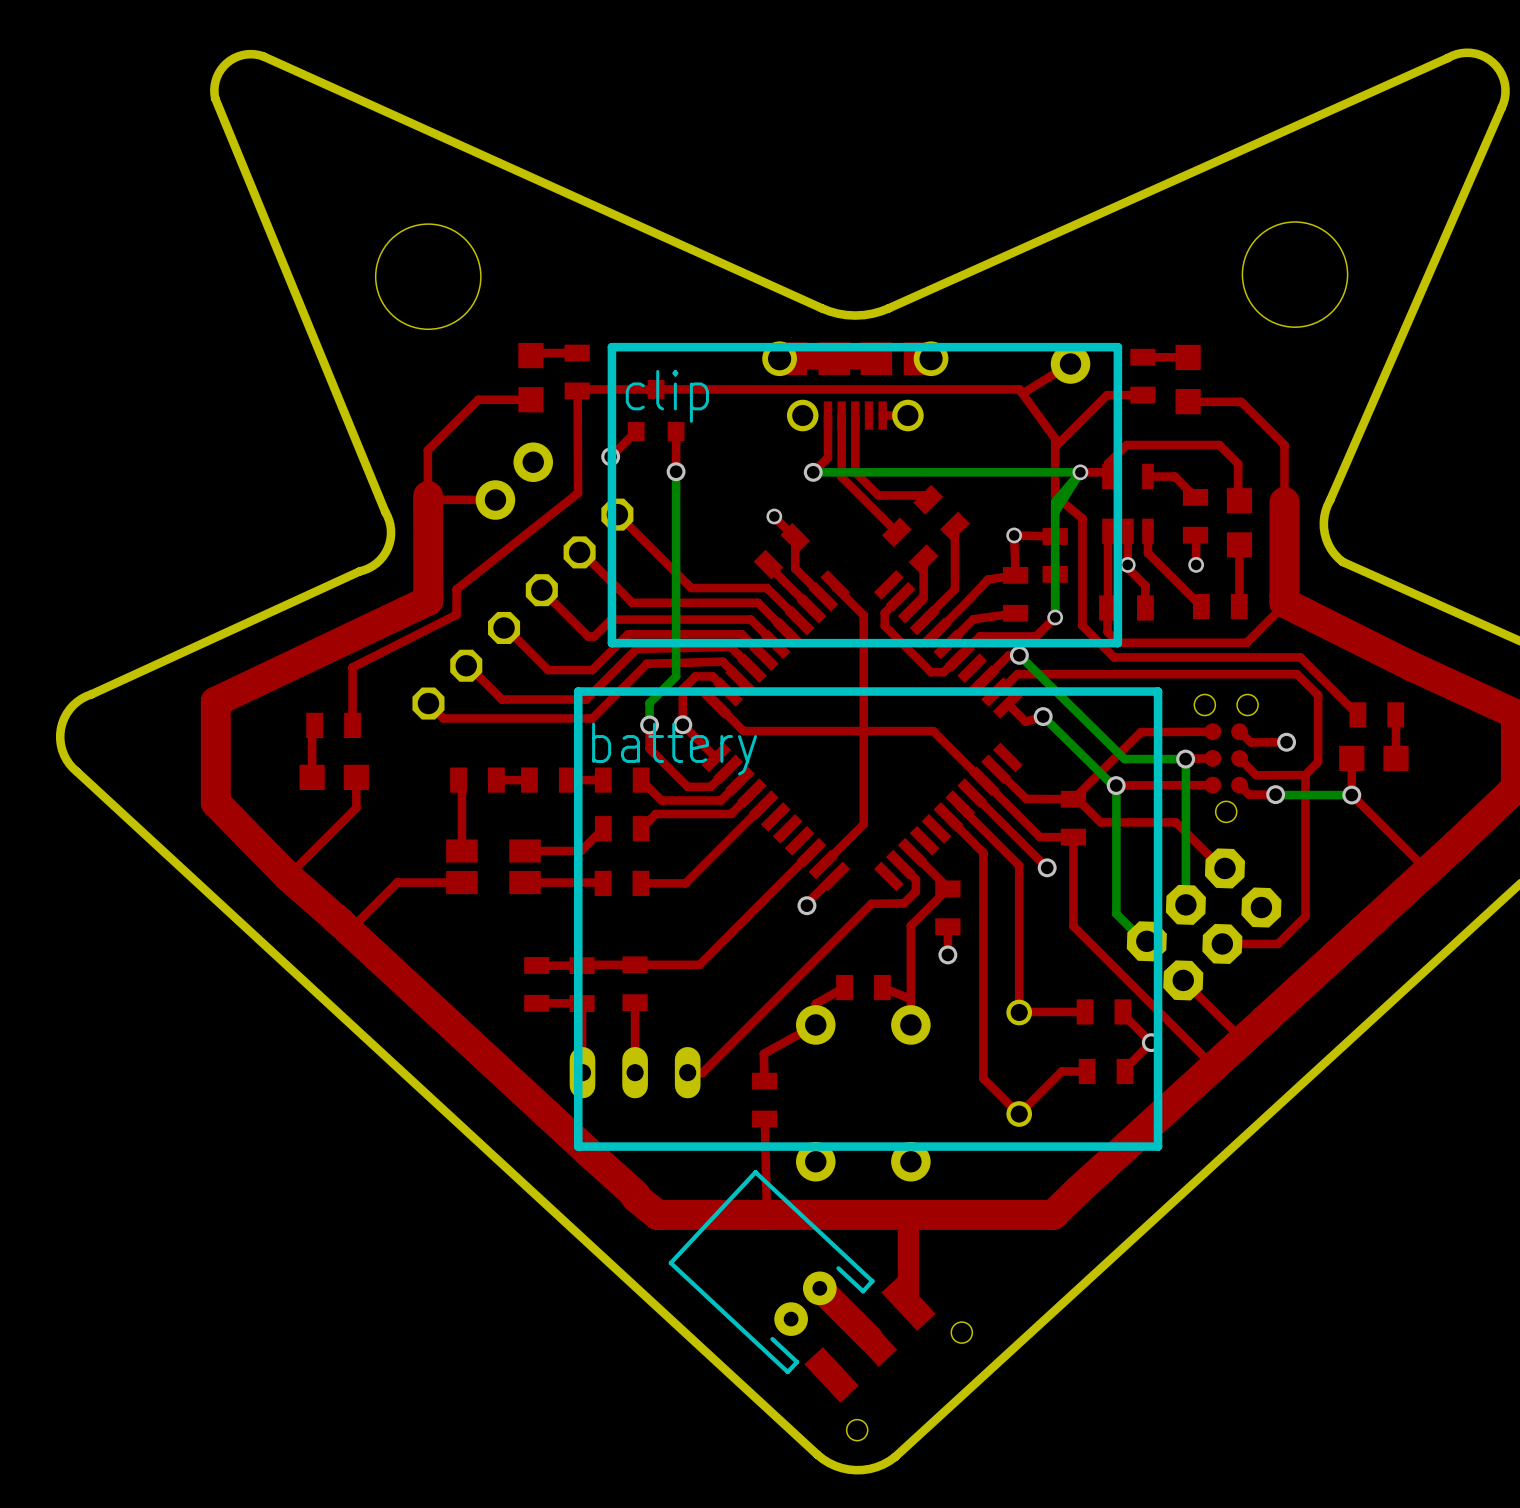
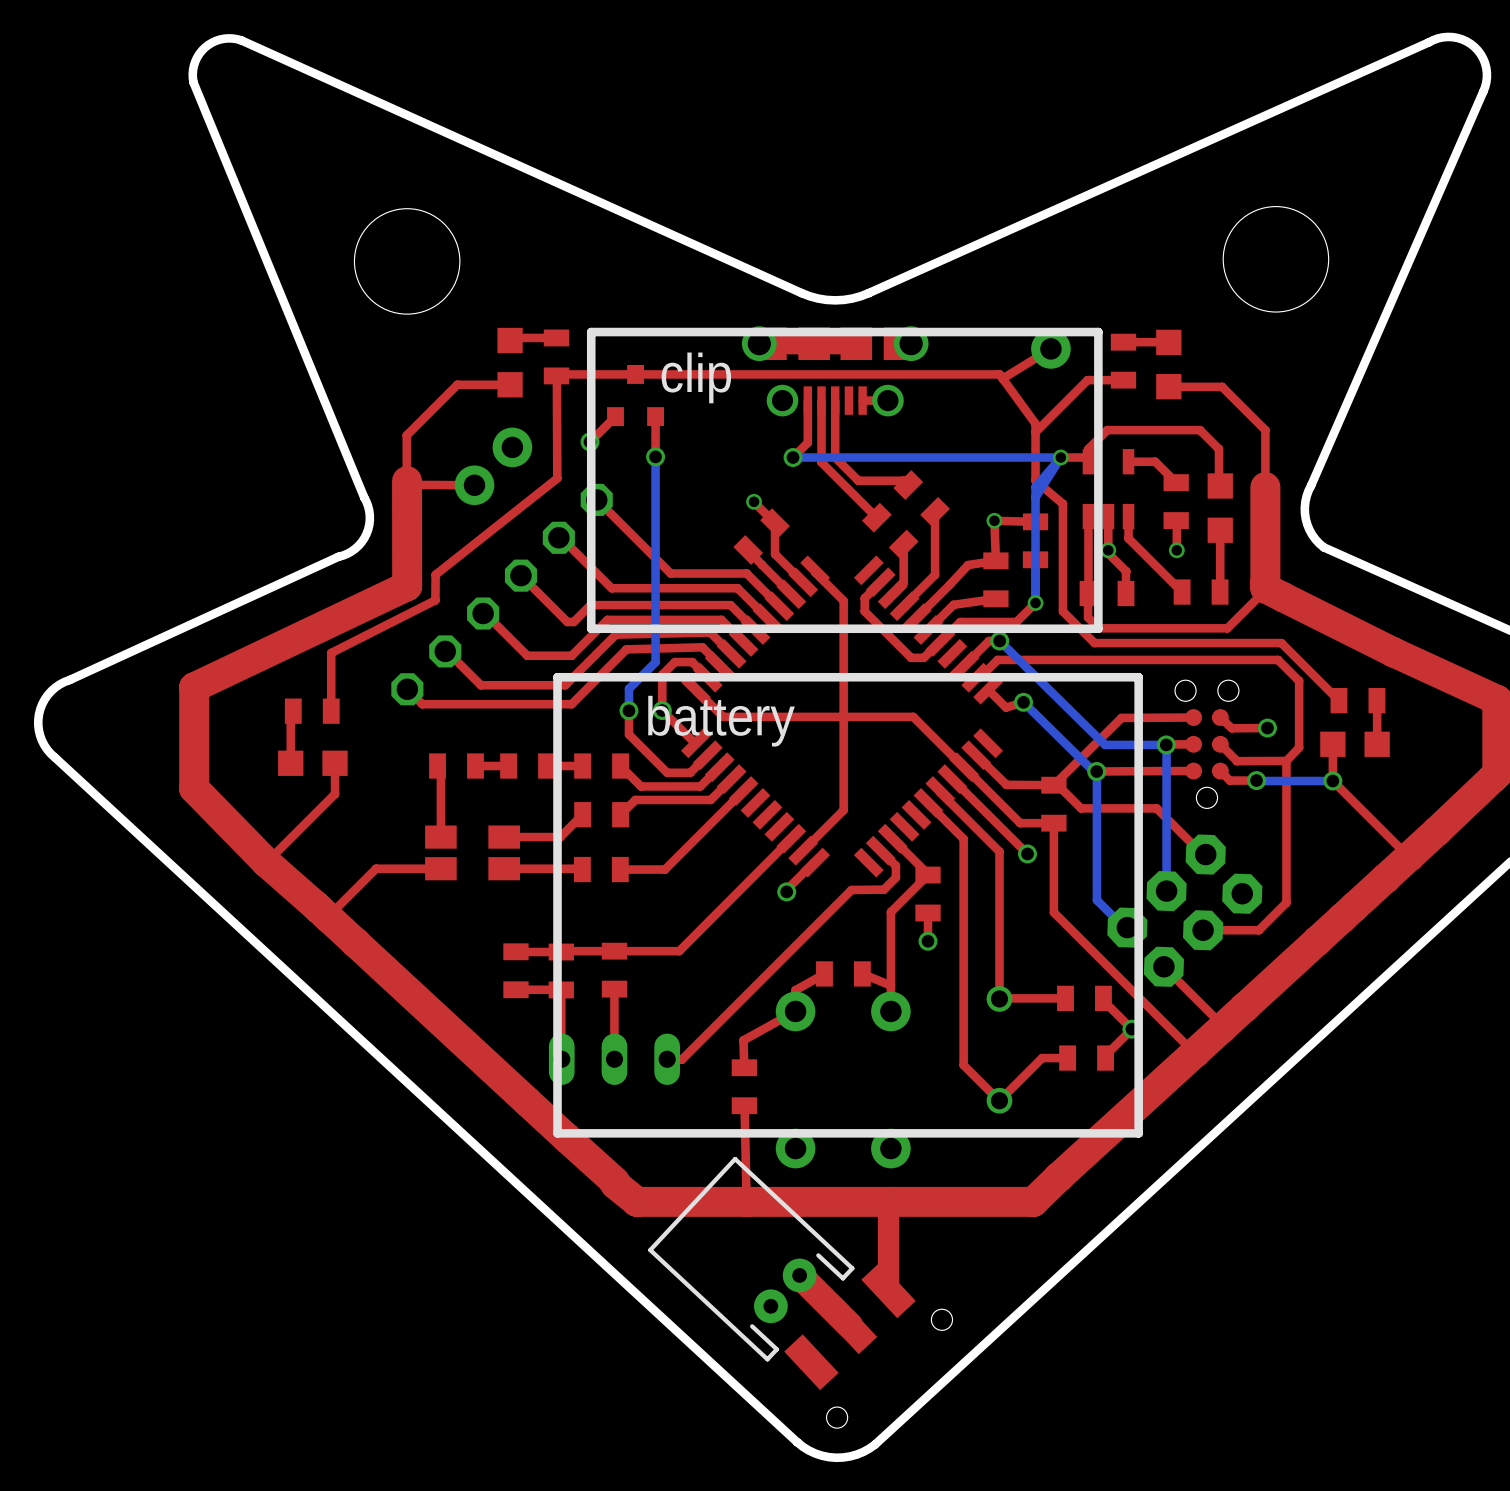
text position: clip (667, 396) -> clip (696, 377)
text position: battery (674, 748) -> battery (721, 721)

